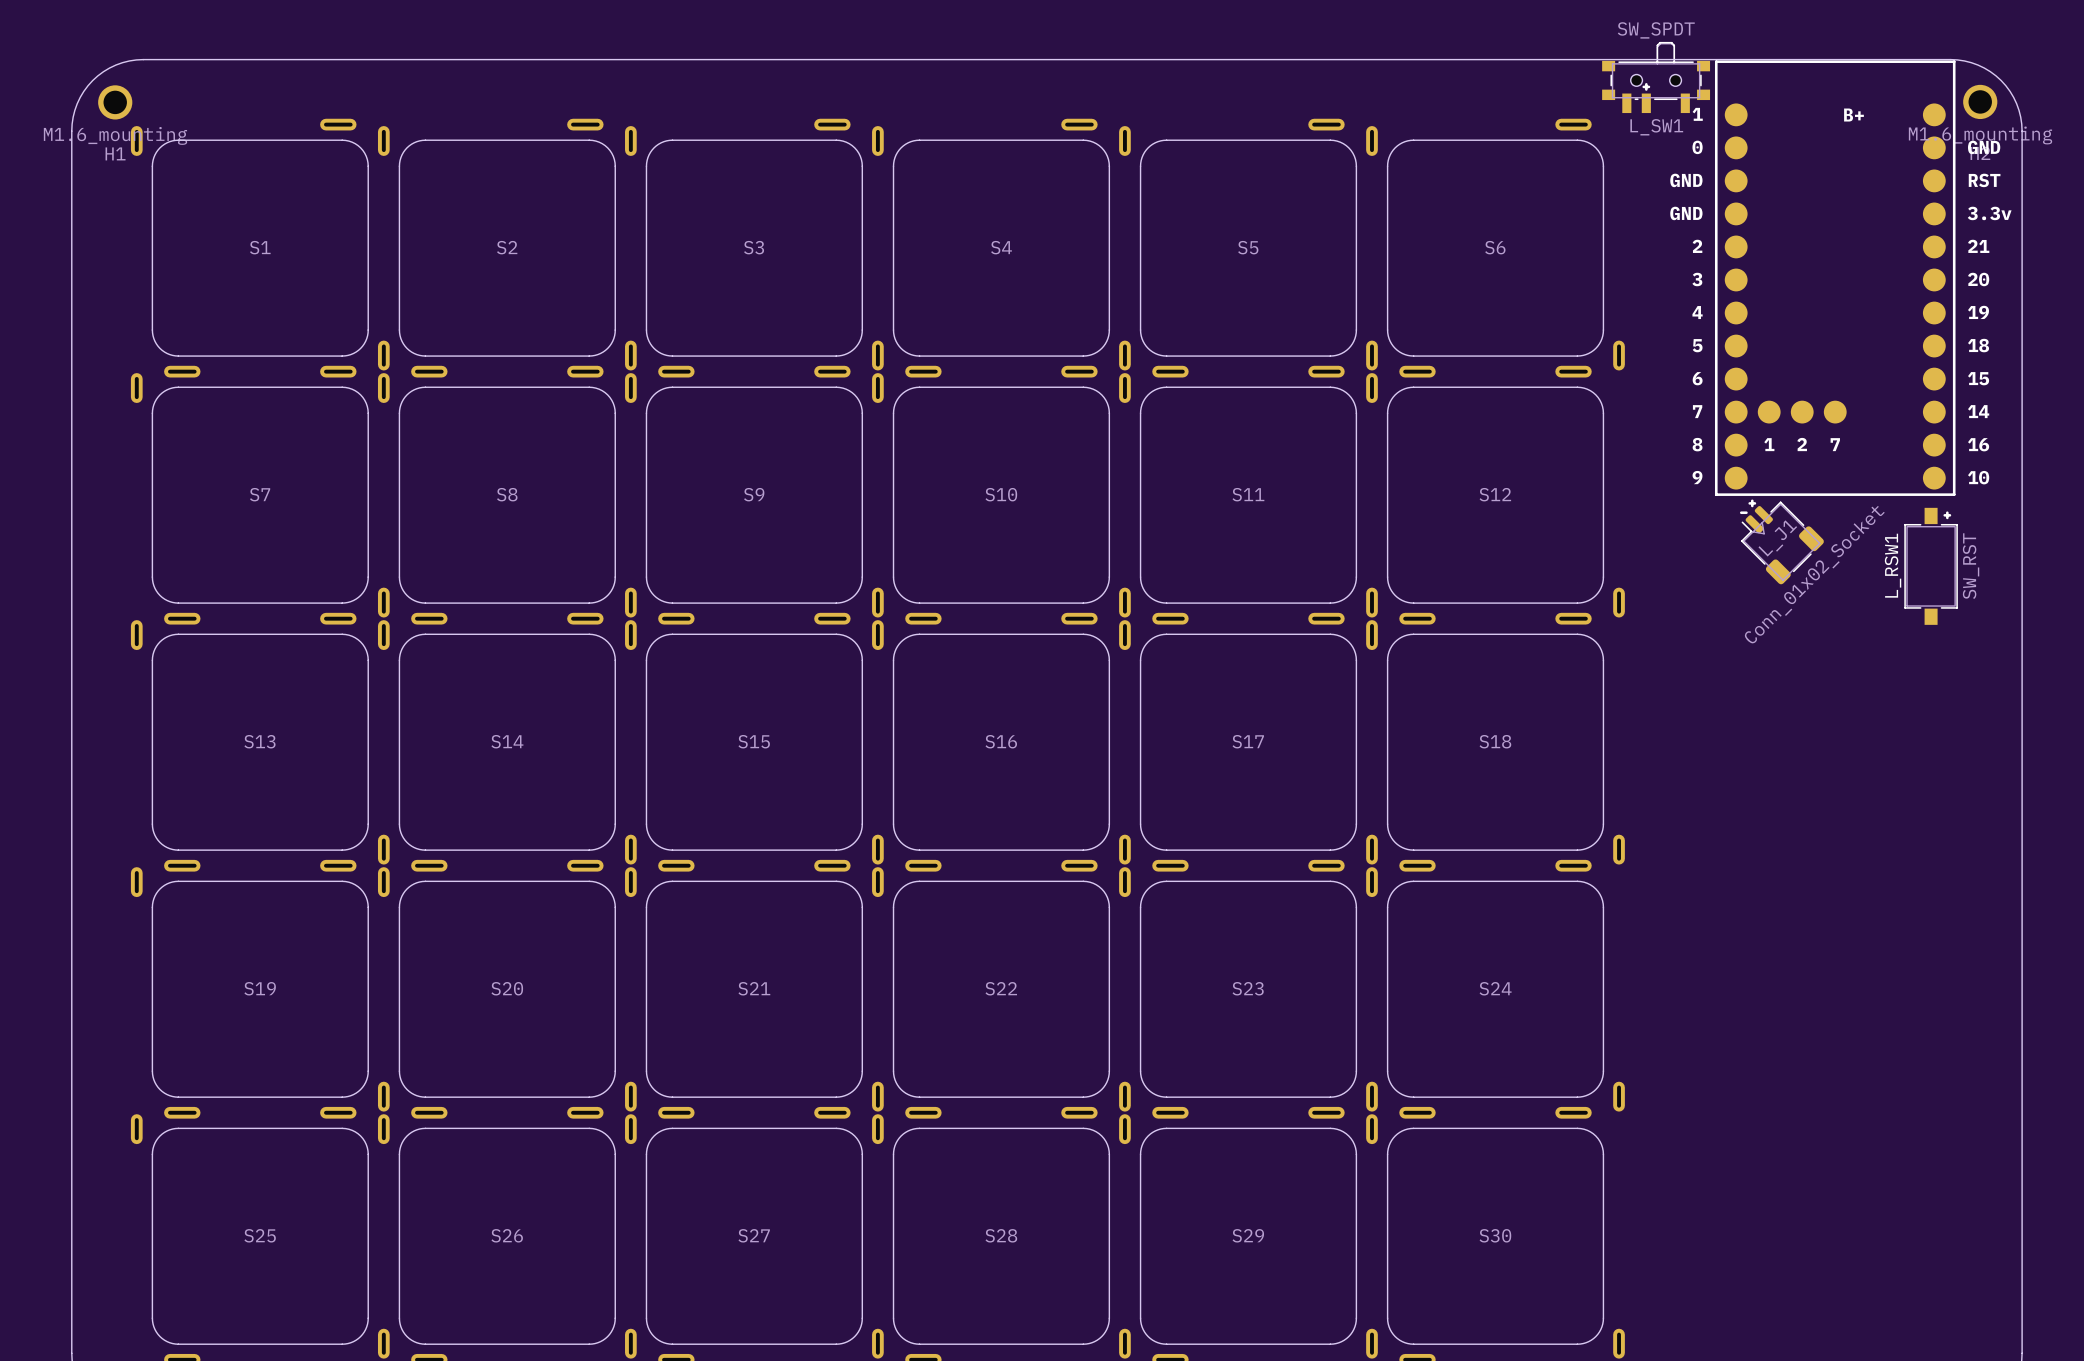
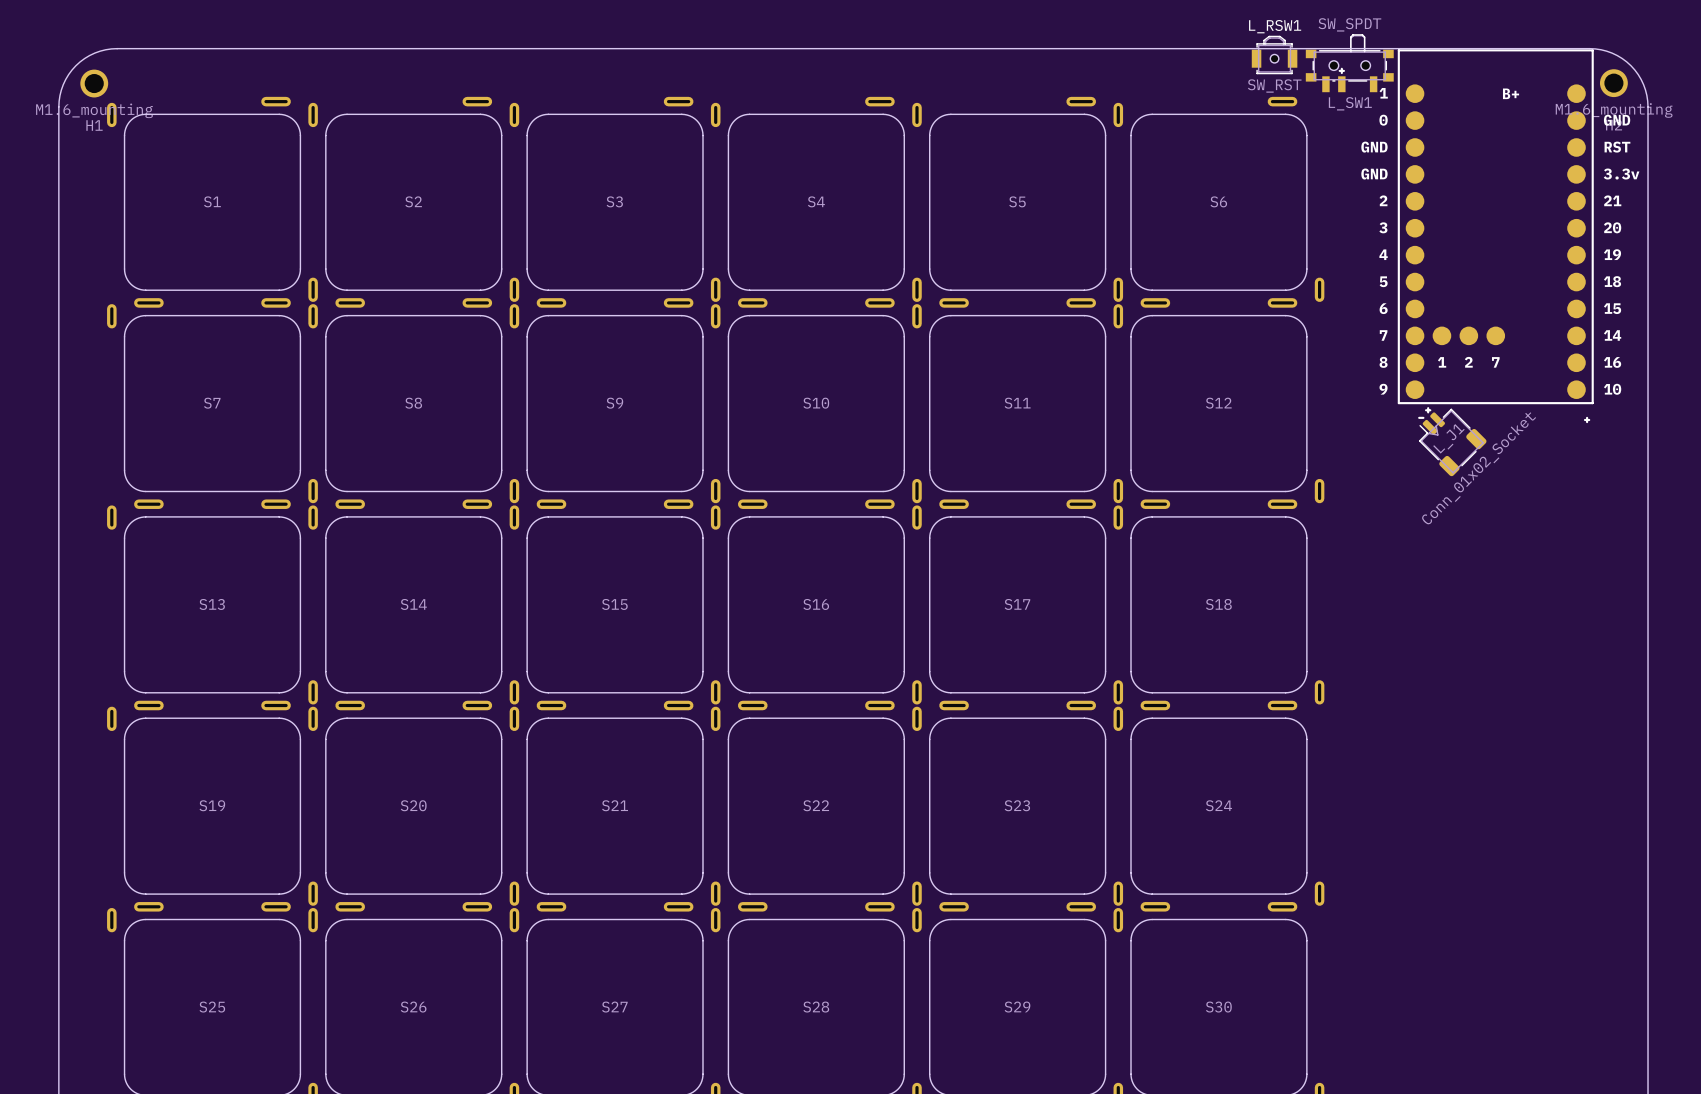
L_RSW1 footprint: [1904, 507, 1958, 625] -> [1251, 35, 1298, 75]
L_RSW1 name position: L_RSW1 (1893, 565) -> L_RSW1 (1275, 26)
L_RSW1 value position: SW_RST (1971, 566) -> SW_RST (1274, 86)

